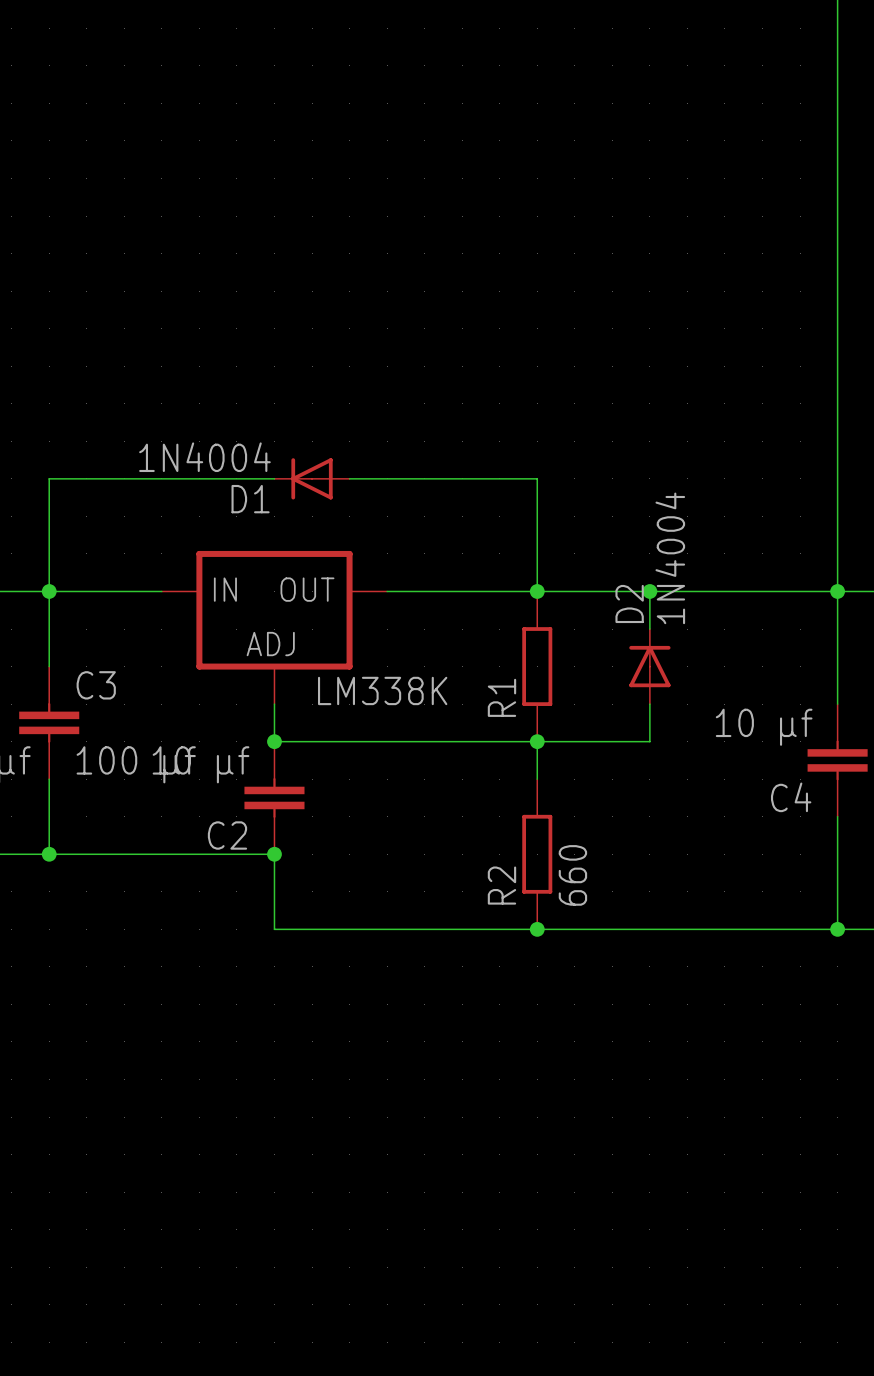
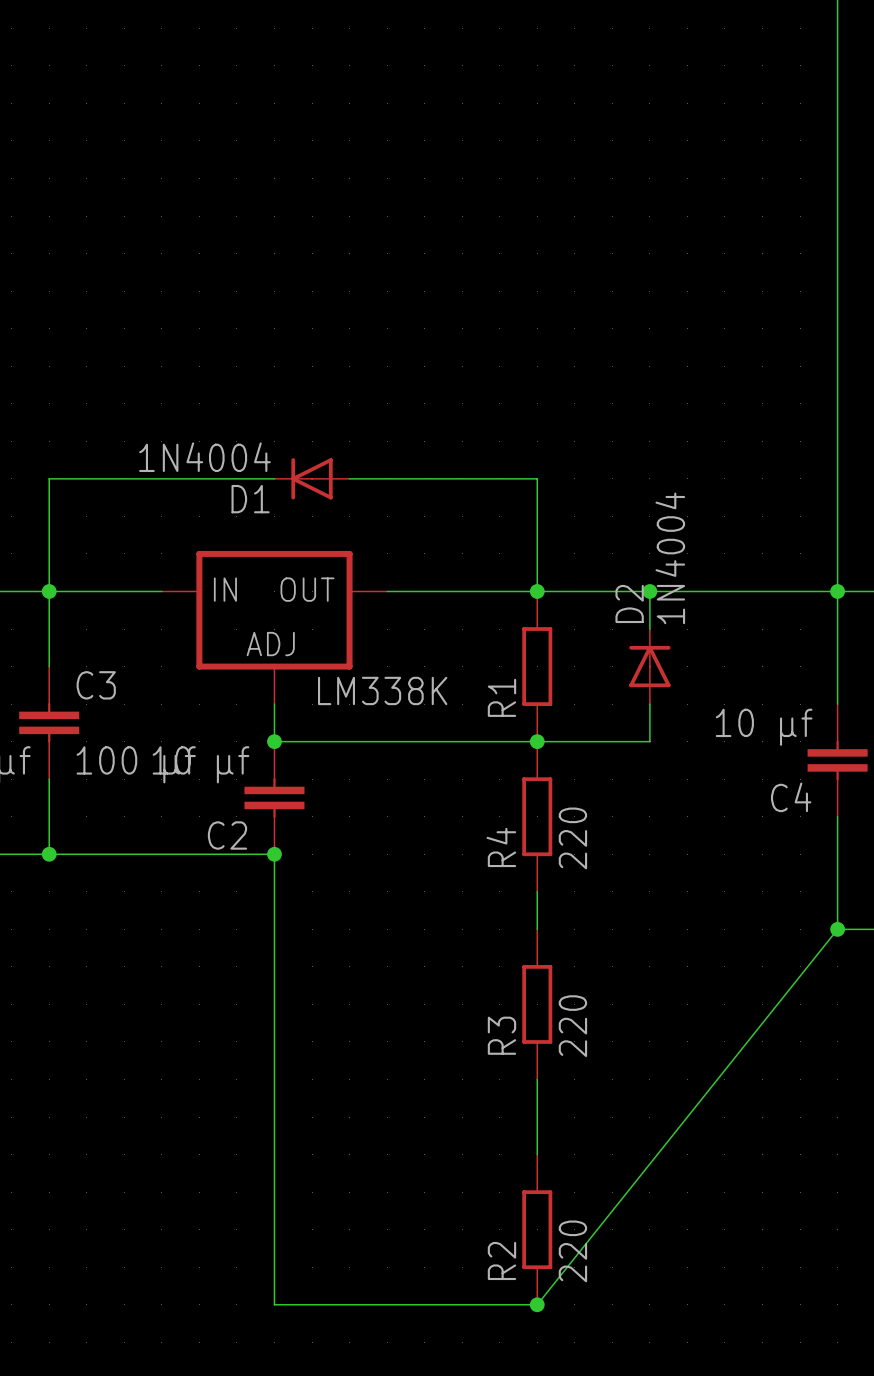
R4: none -> 220 (537, 816)
R2 position: (537, 854) -> (537, 1229)
R2 value: 660 (572, 875) -> 220 (572, 1251)
wire: (274, 929) (837, 929) -> (274, 929) (274, 1304) (537, 1304) (837, 929)
junction: (537, 929) -> none
R3: none -> 220 (537, 1004)
wire: none -> (537, 1079) (537, 1154)
junction: none -> (537, 1304)

